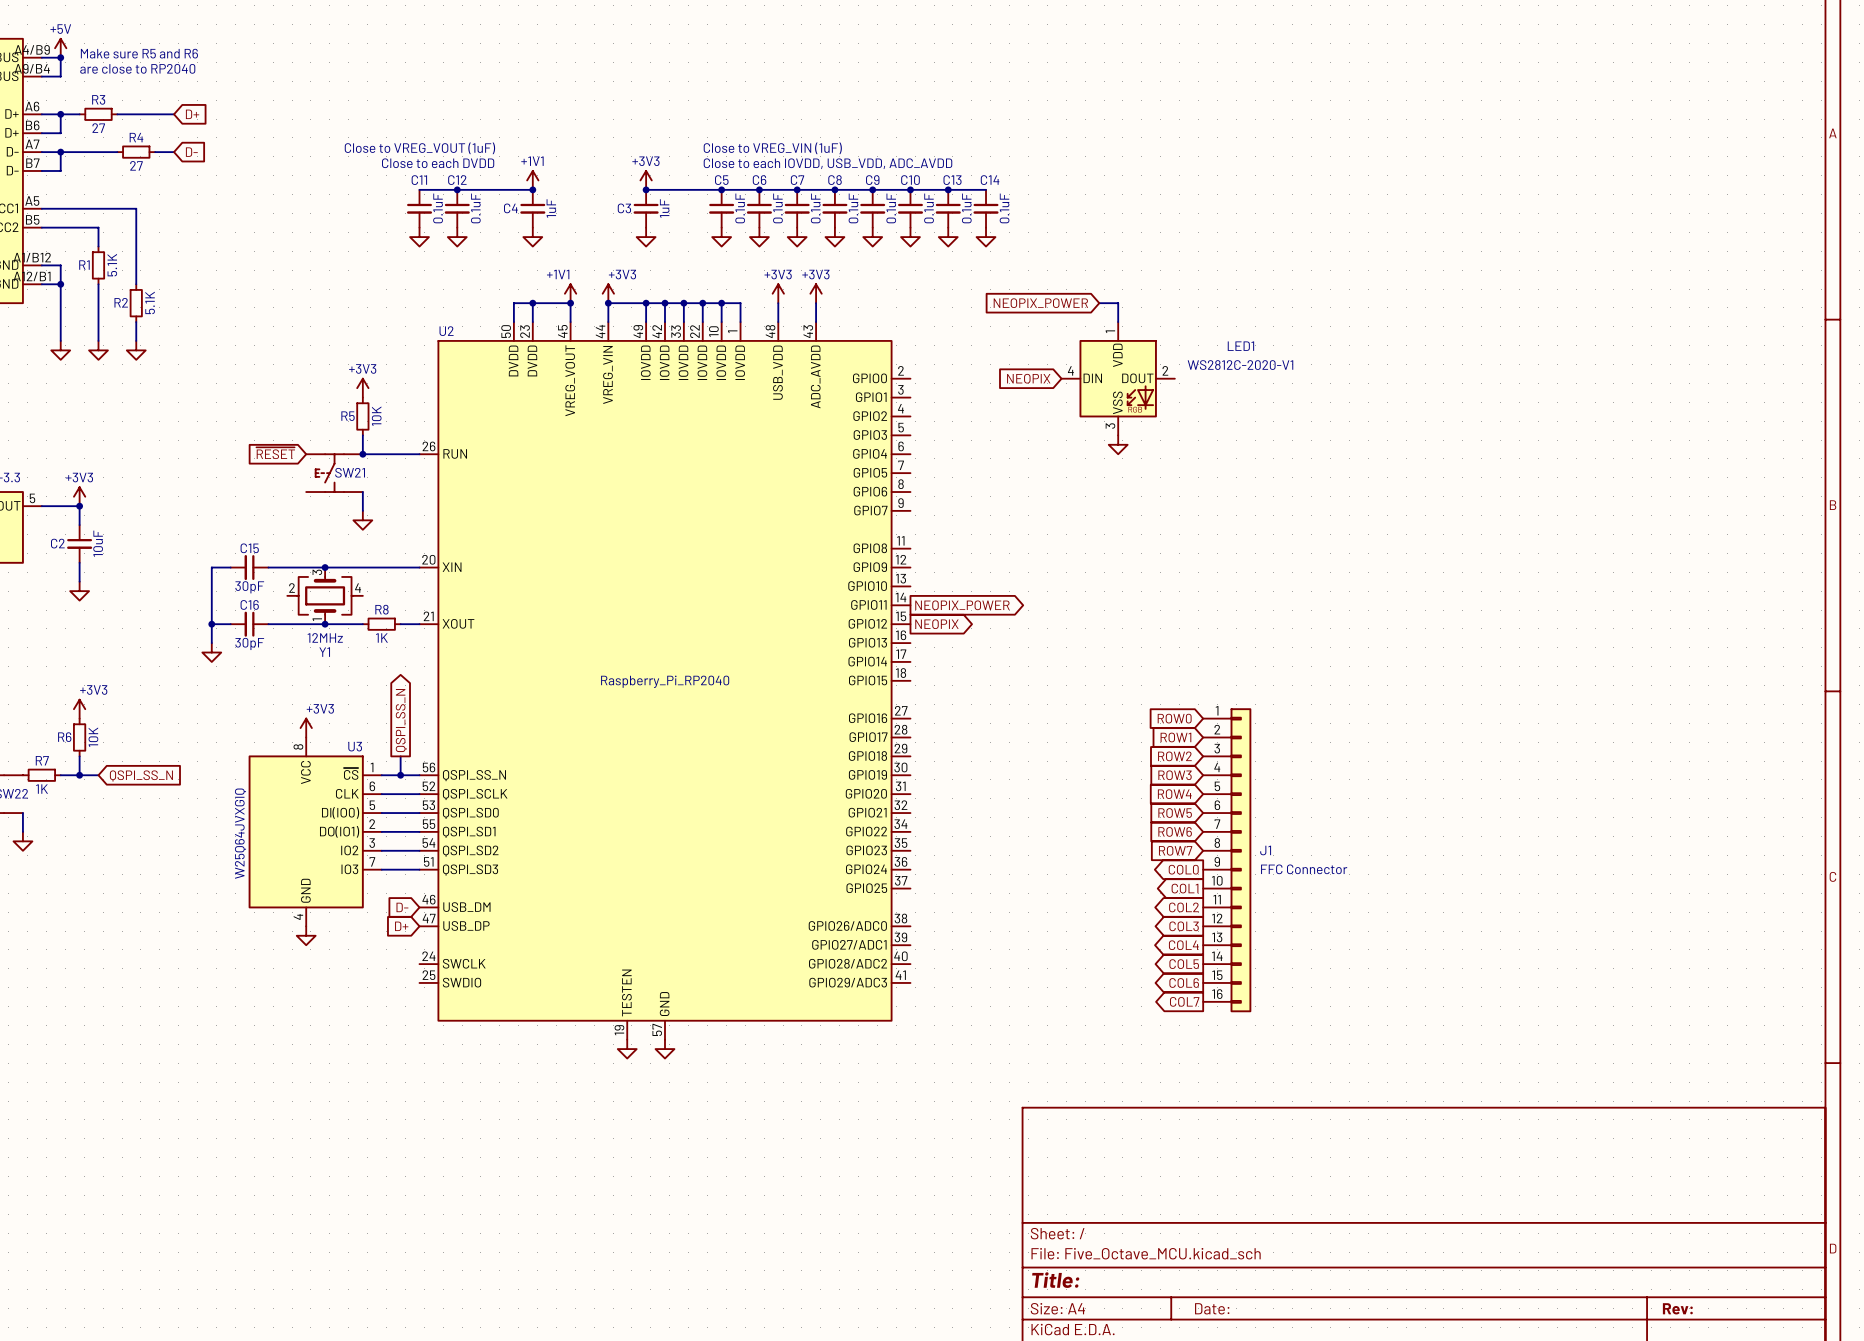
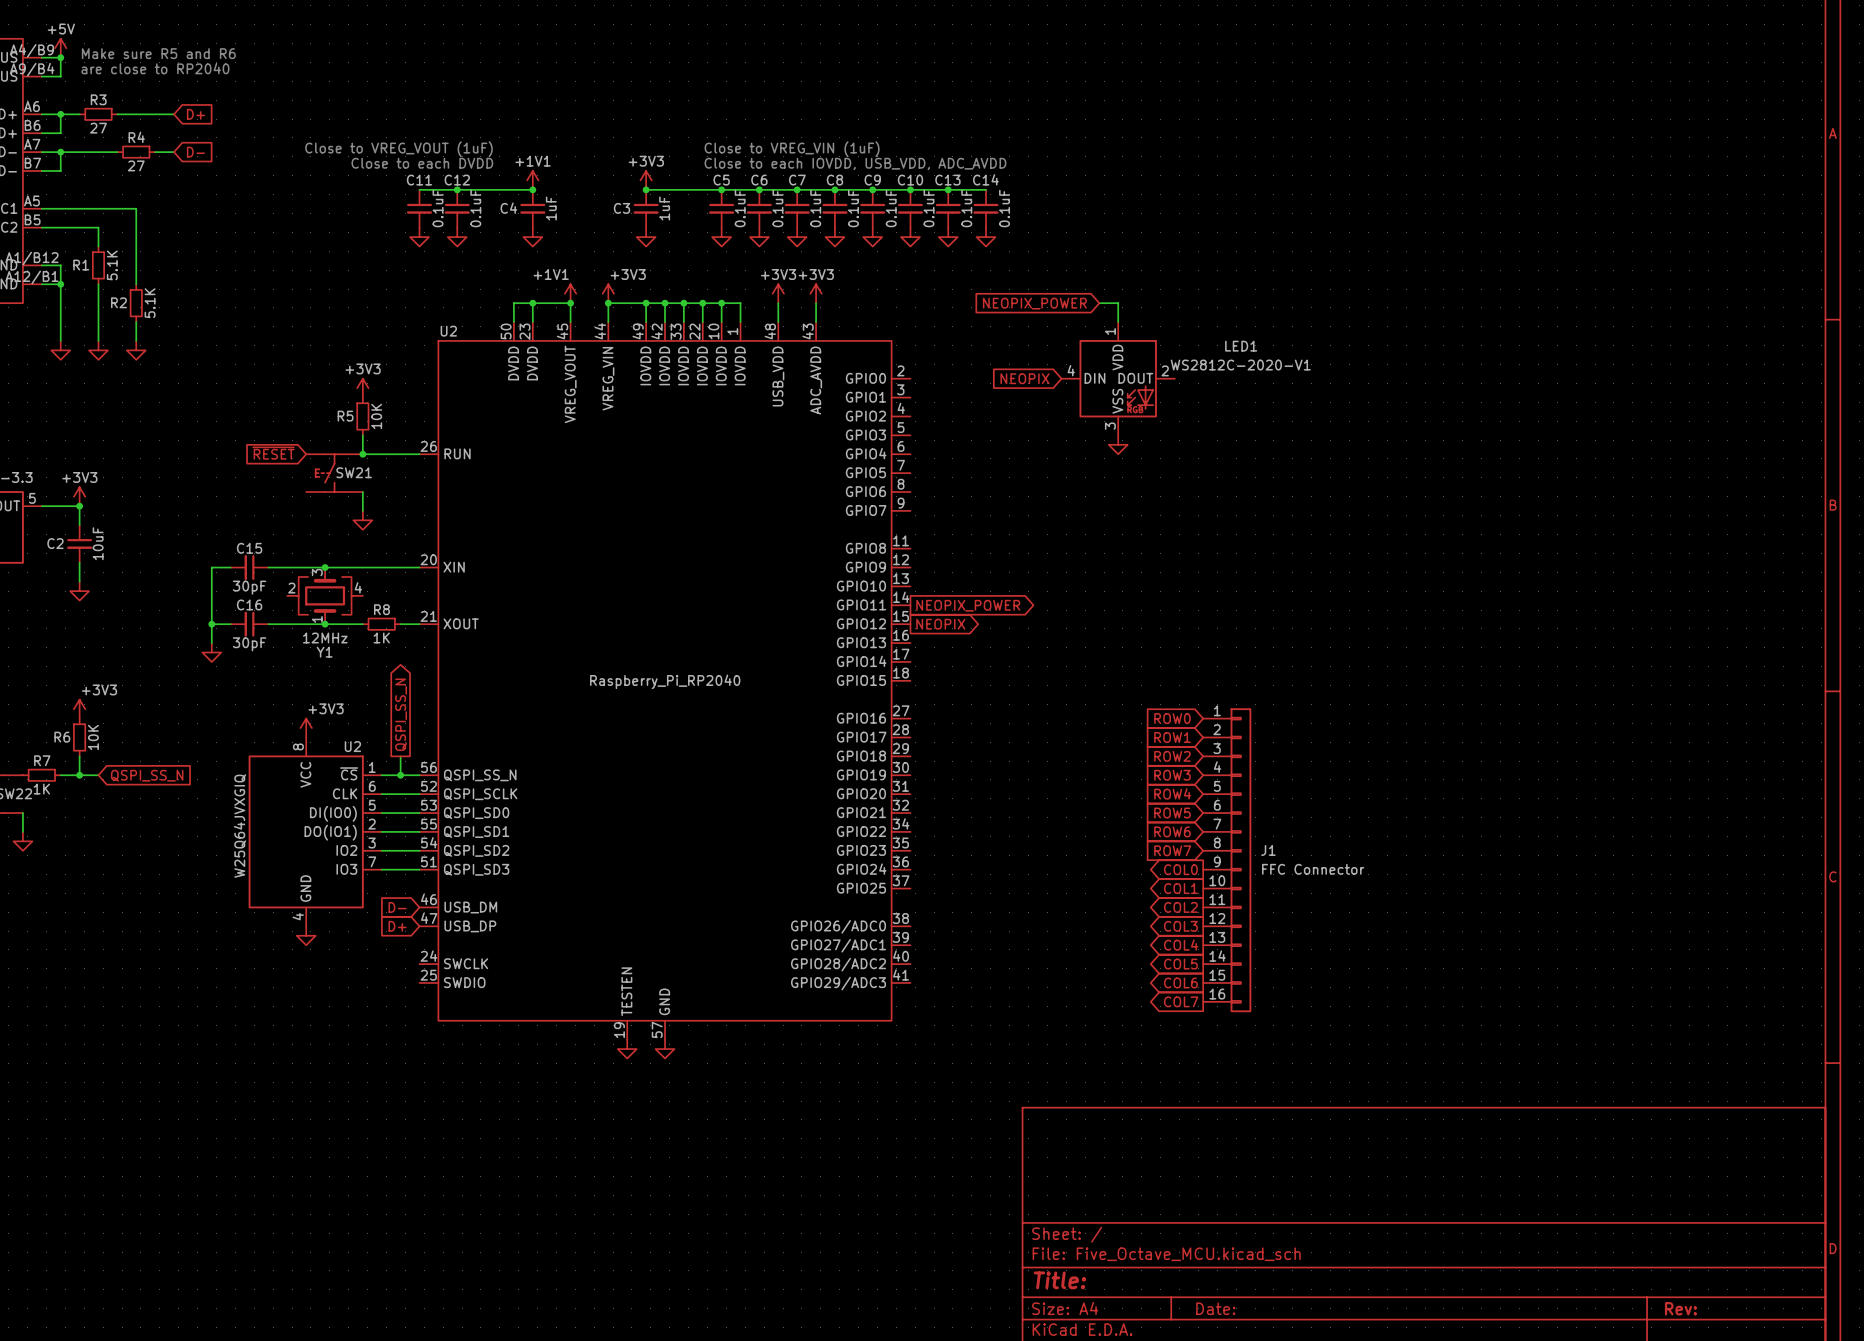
U3 name: U3 (355, 746) -> U2 (352, 746)

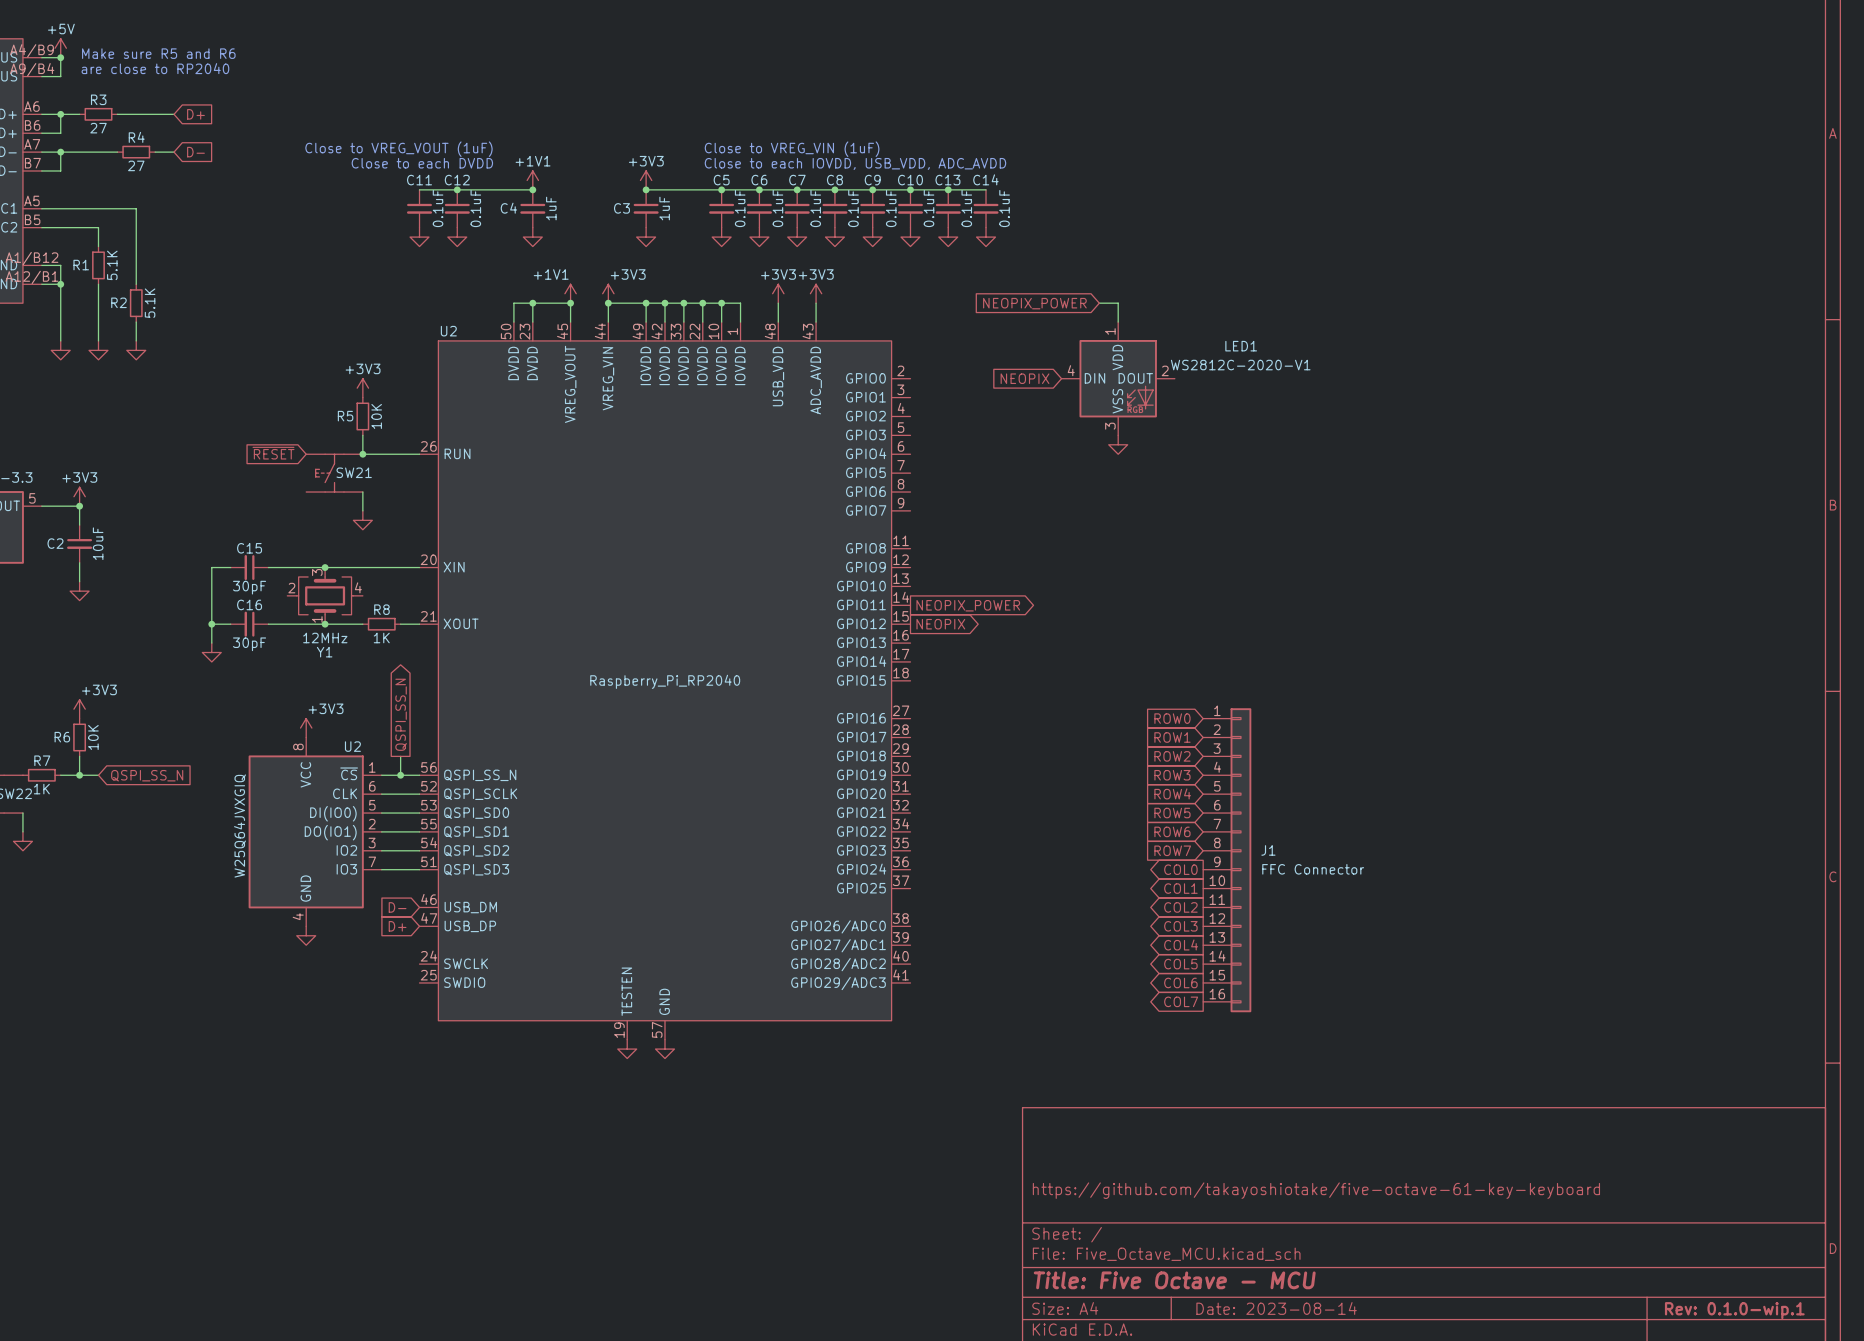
title block: none -> https://github.com/takayoshiotake/five-octave-61-key-keyboard (1316, 1190)
title block: Title: (1059, 1280) -> Title: Five Octave - MCU (1174, 1280)
title block: Date: (1215, 1308) -> Date: 2023-08-14 (1276, 1308)
title block: Rev: (1680, 1308) -> Rev: 0.1.0-wip.1 (1734, 1310)

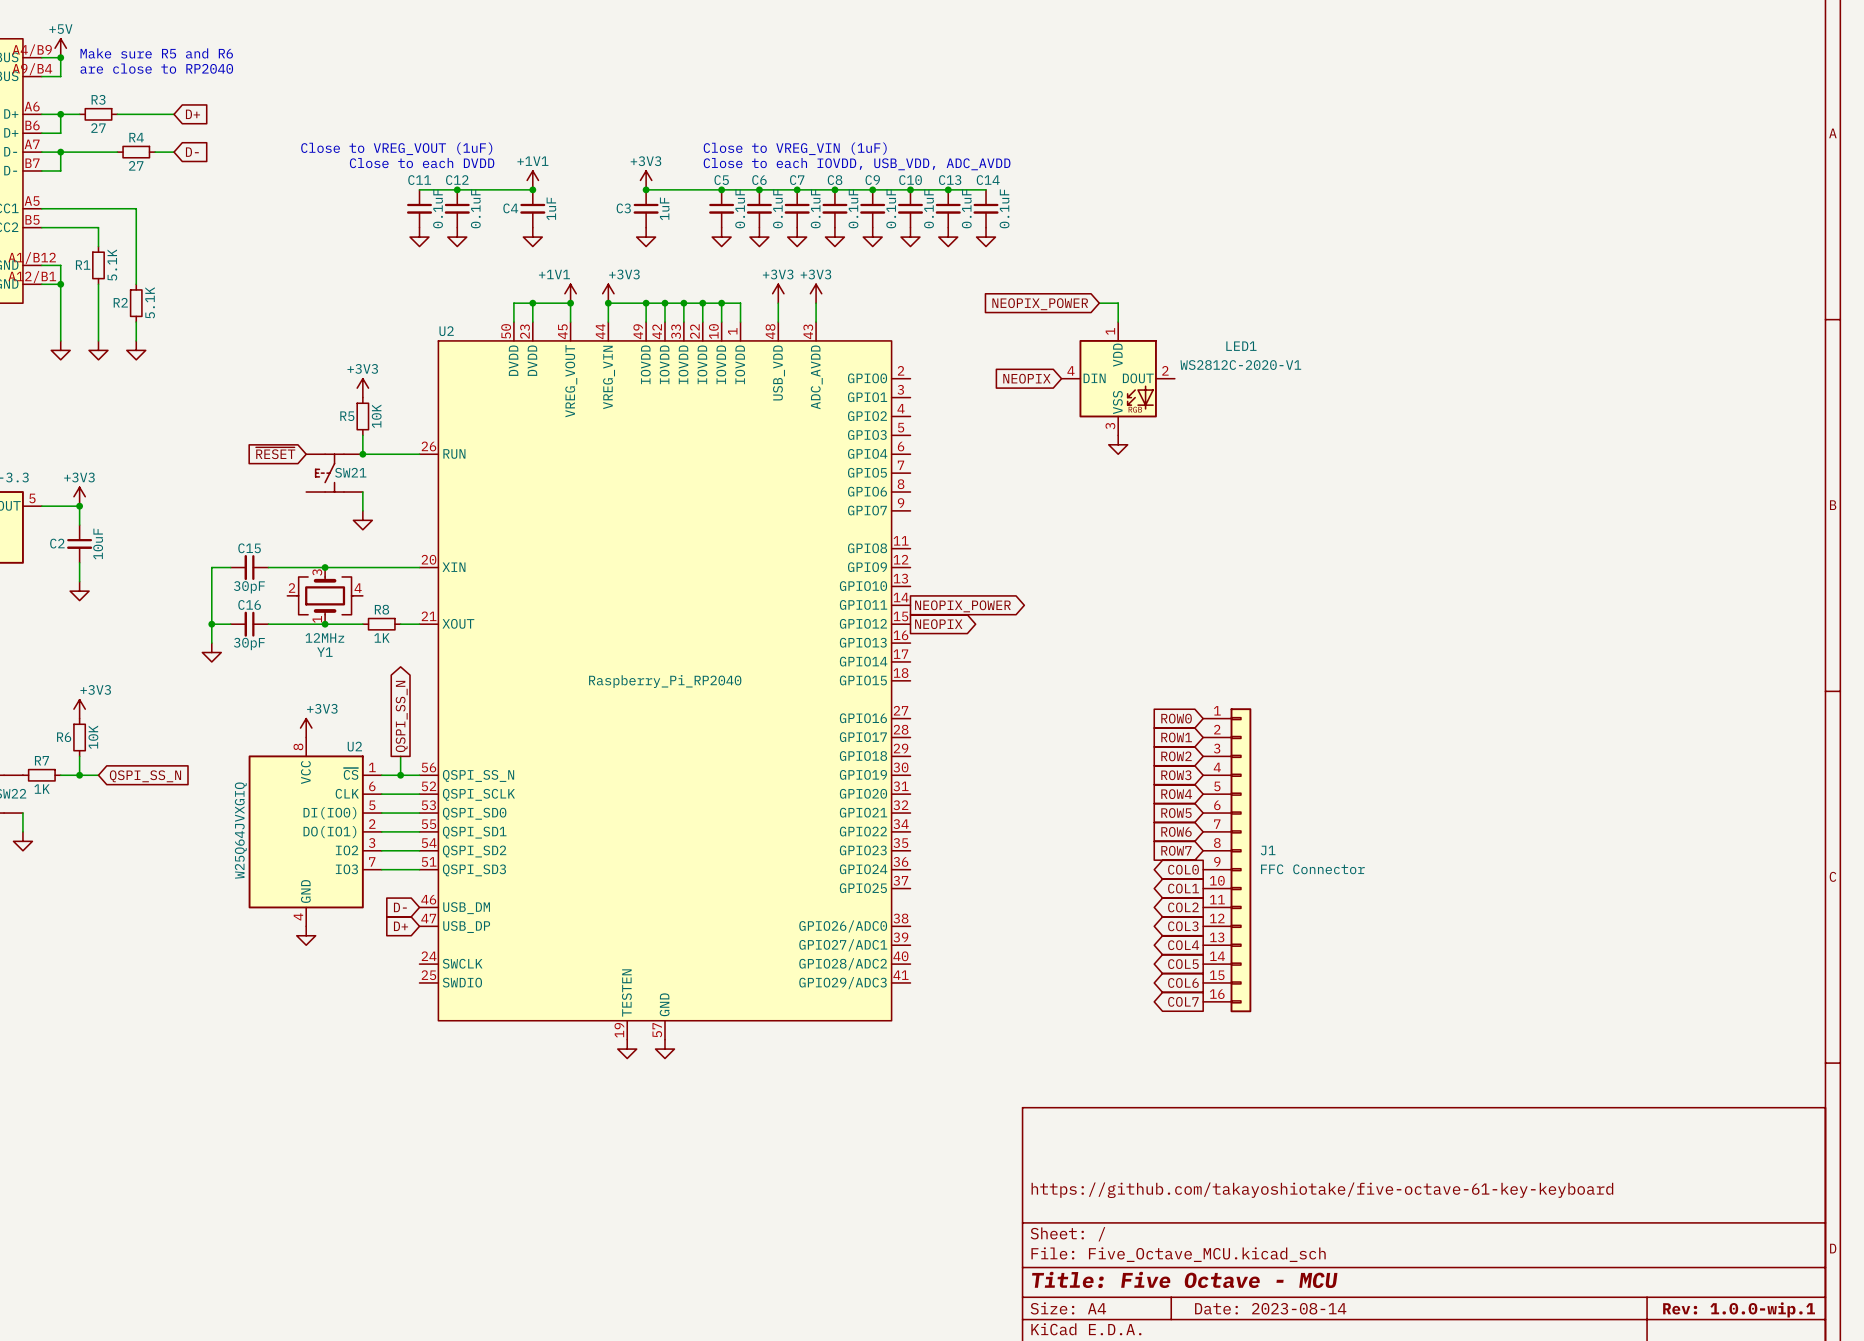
title block: Rev: 0.1.0-wip.1 (1734, 1310) -> Rev: 1.0.0-wip.1 (1739, 1309)

